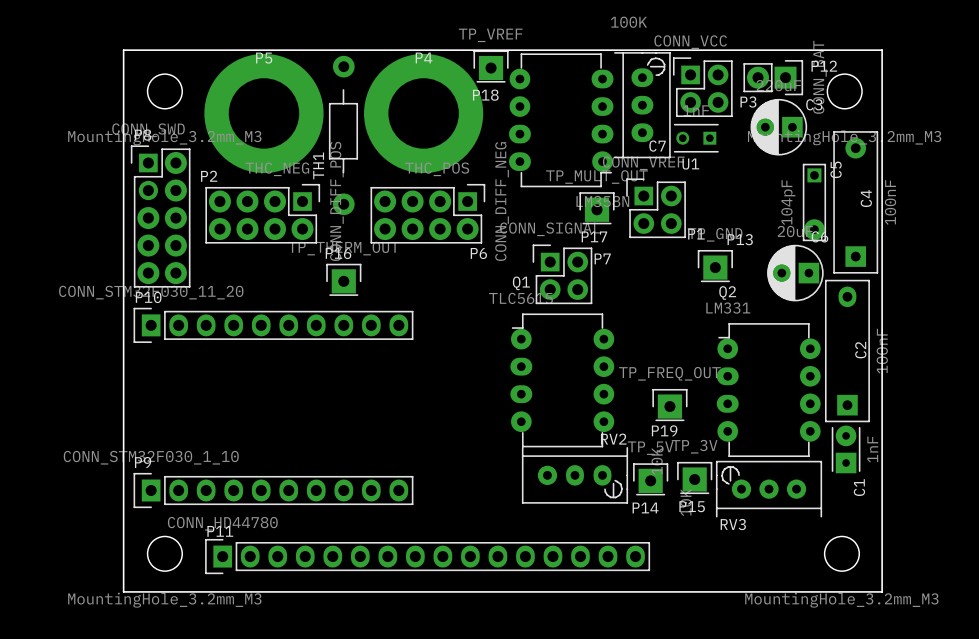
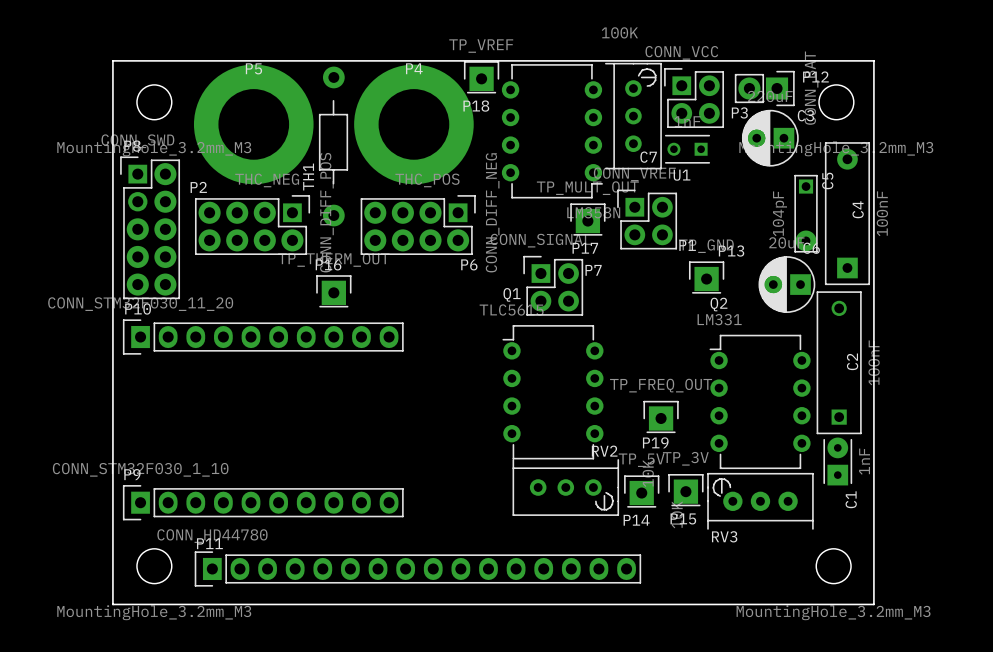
part footprint: [614, 52, 671, 159] -> [605, 62, 662, 170]
U1 footprint: [508, 53, 614, 188] -> [501, 64, 603, 199]
C2 footprint: [824, 279, 870, 423] -> [816, 291, 862, 435]
Q1 footprint: [510, 313, 615, 448] -> [502, 325, 604, 460]
Q2 footprint: [716, 323, 821, 458] -> [709, 334, 811, 470]
RV2 footprint: [521, 447, 629, 504] -> [512, 459, 620, 516]

